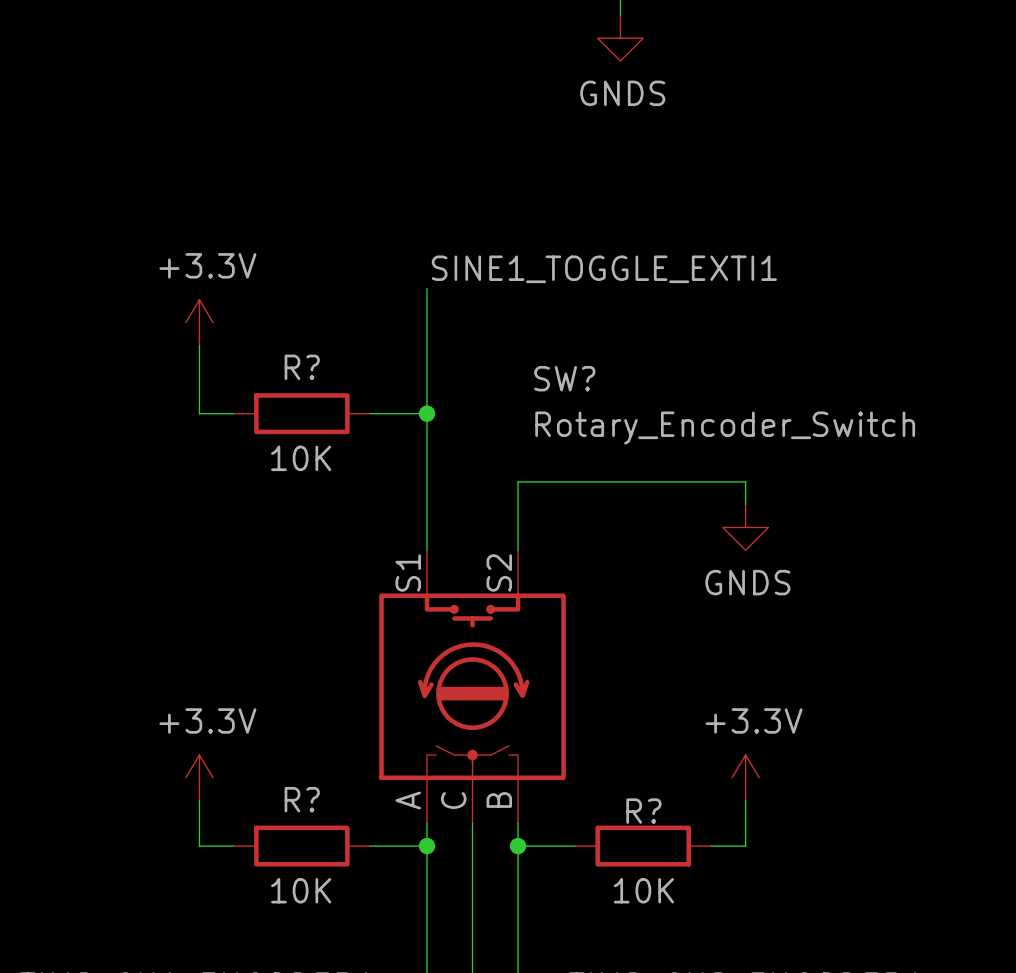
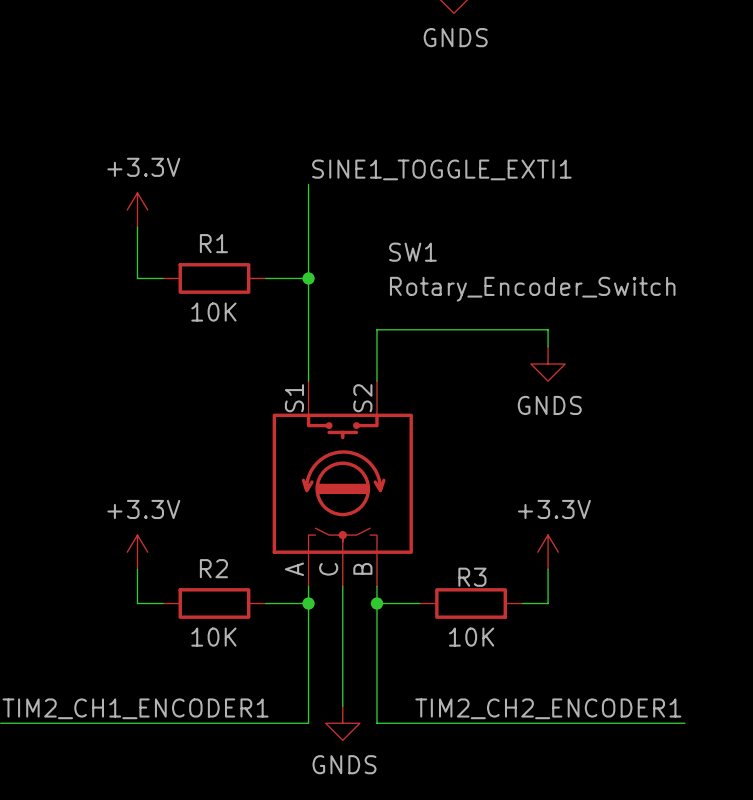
R? name: R? (302, 367) -> R1 (213, 243)
SW? name: SW? (564, 378) -> SW1 (412, 252)
R? name: R? (302, 799) -> R2 (213, 568)
R? name: R? (643, 811) -> R3 (472, 577)

